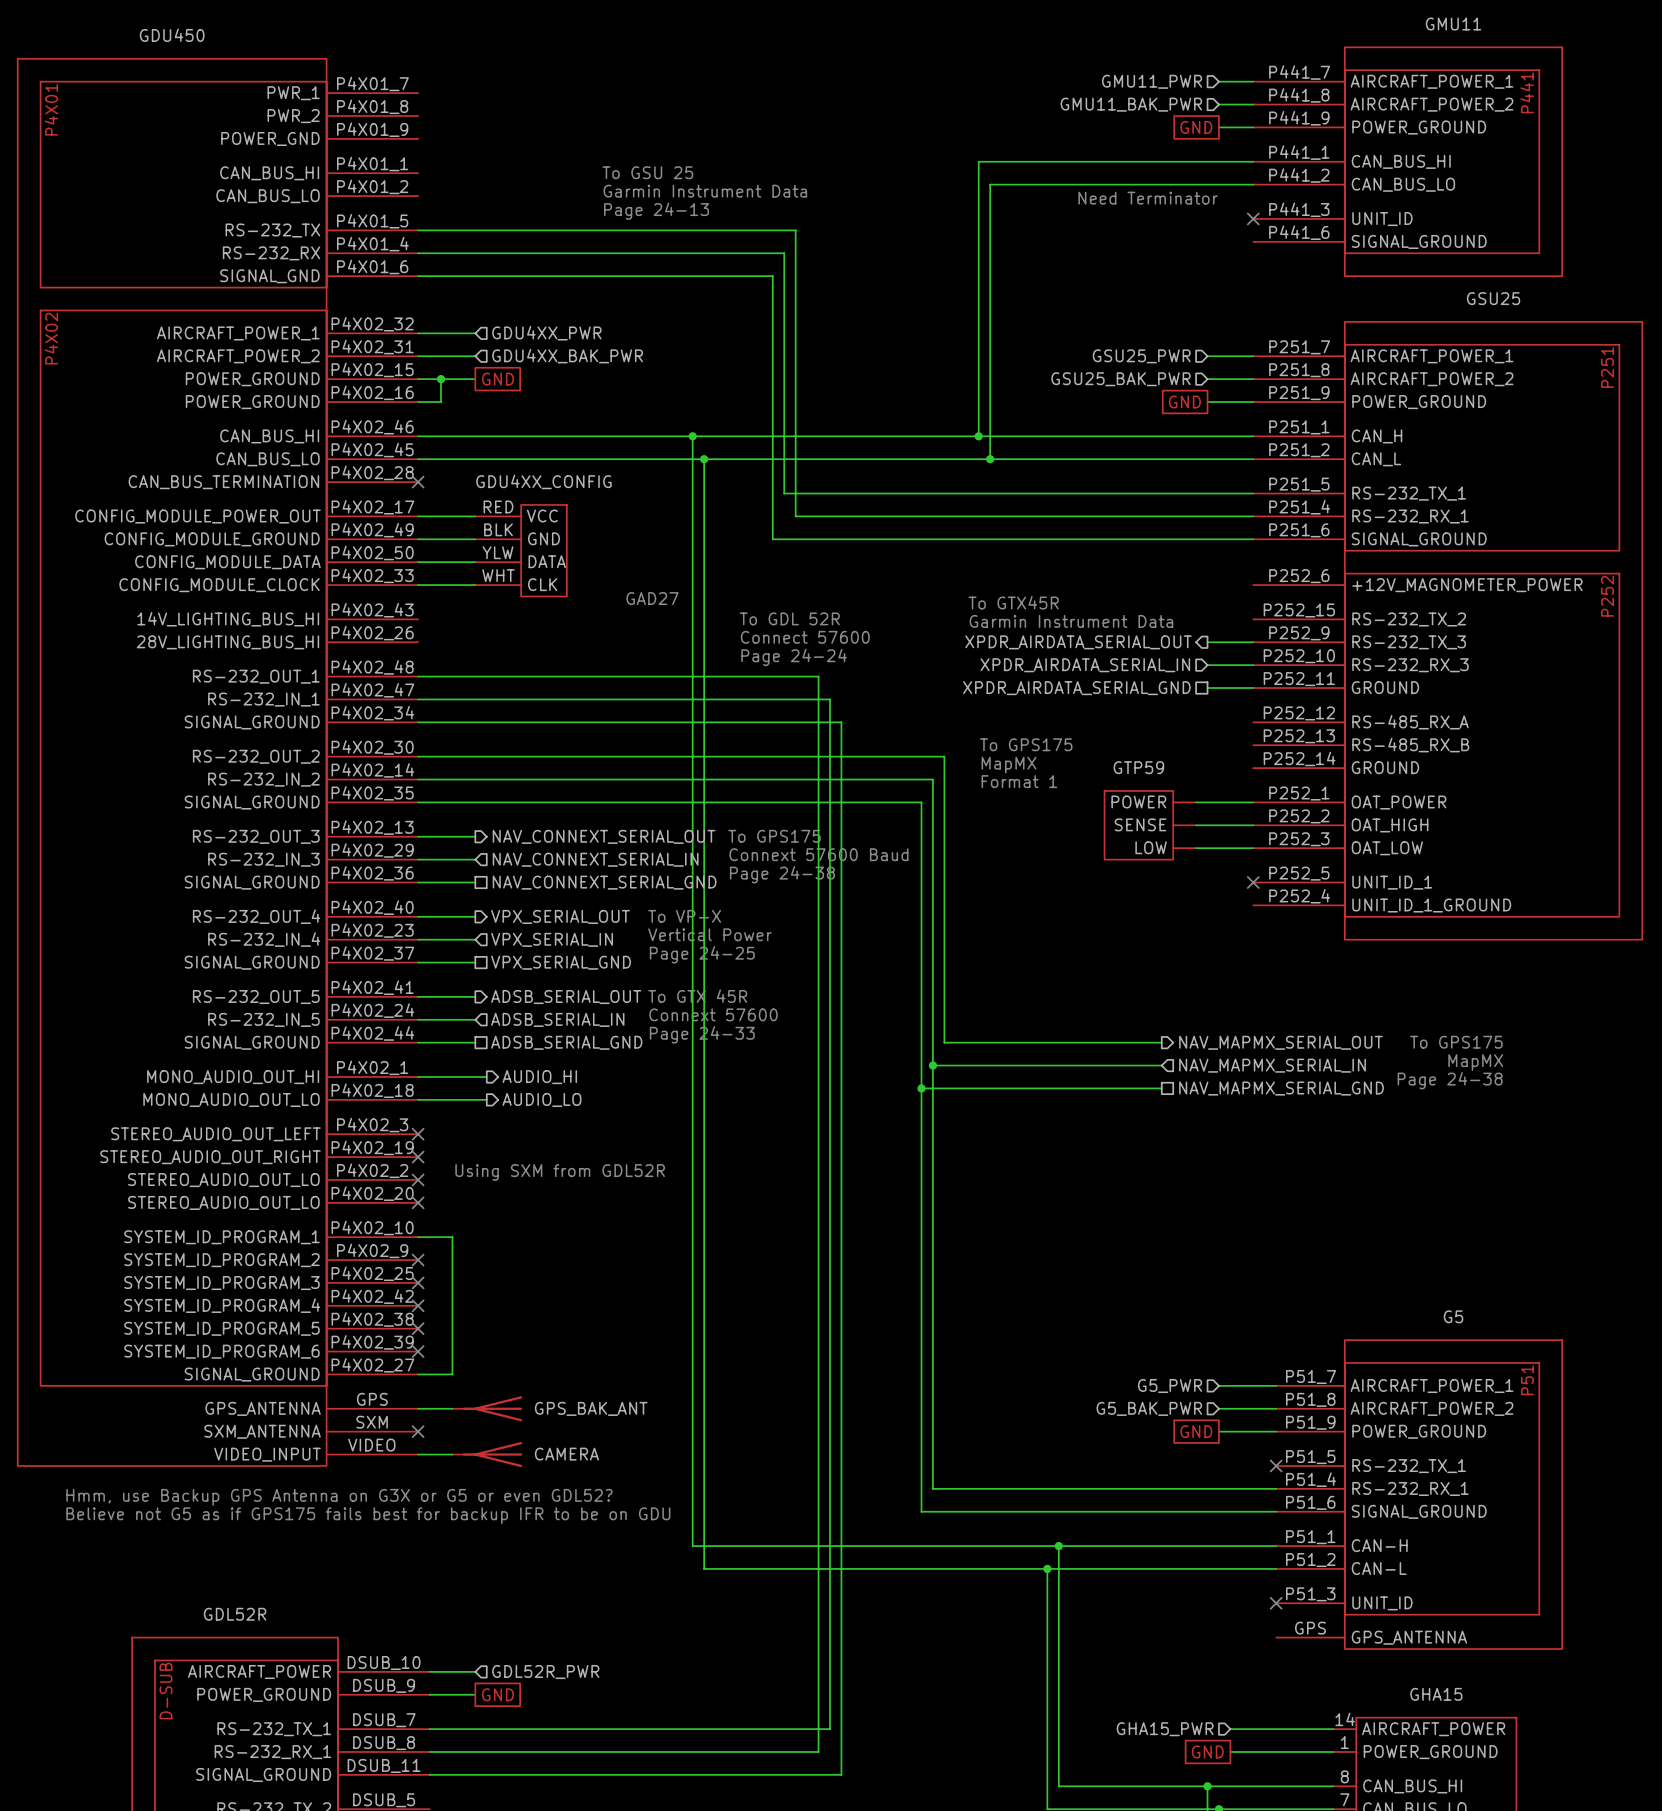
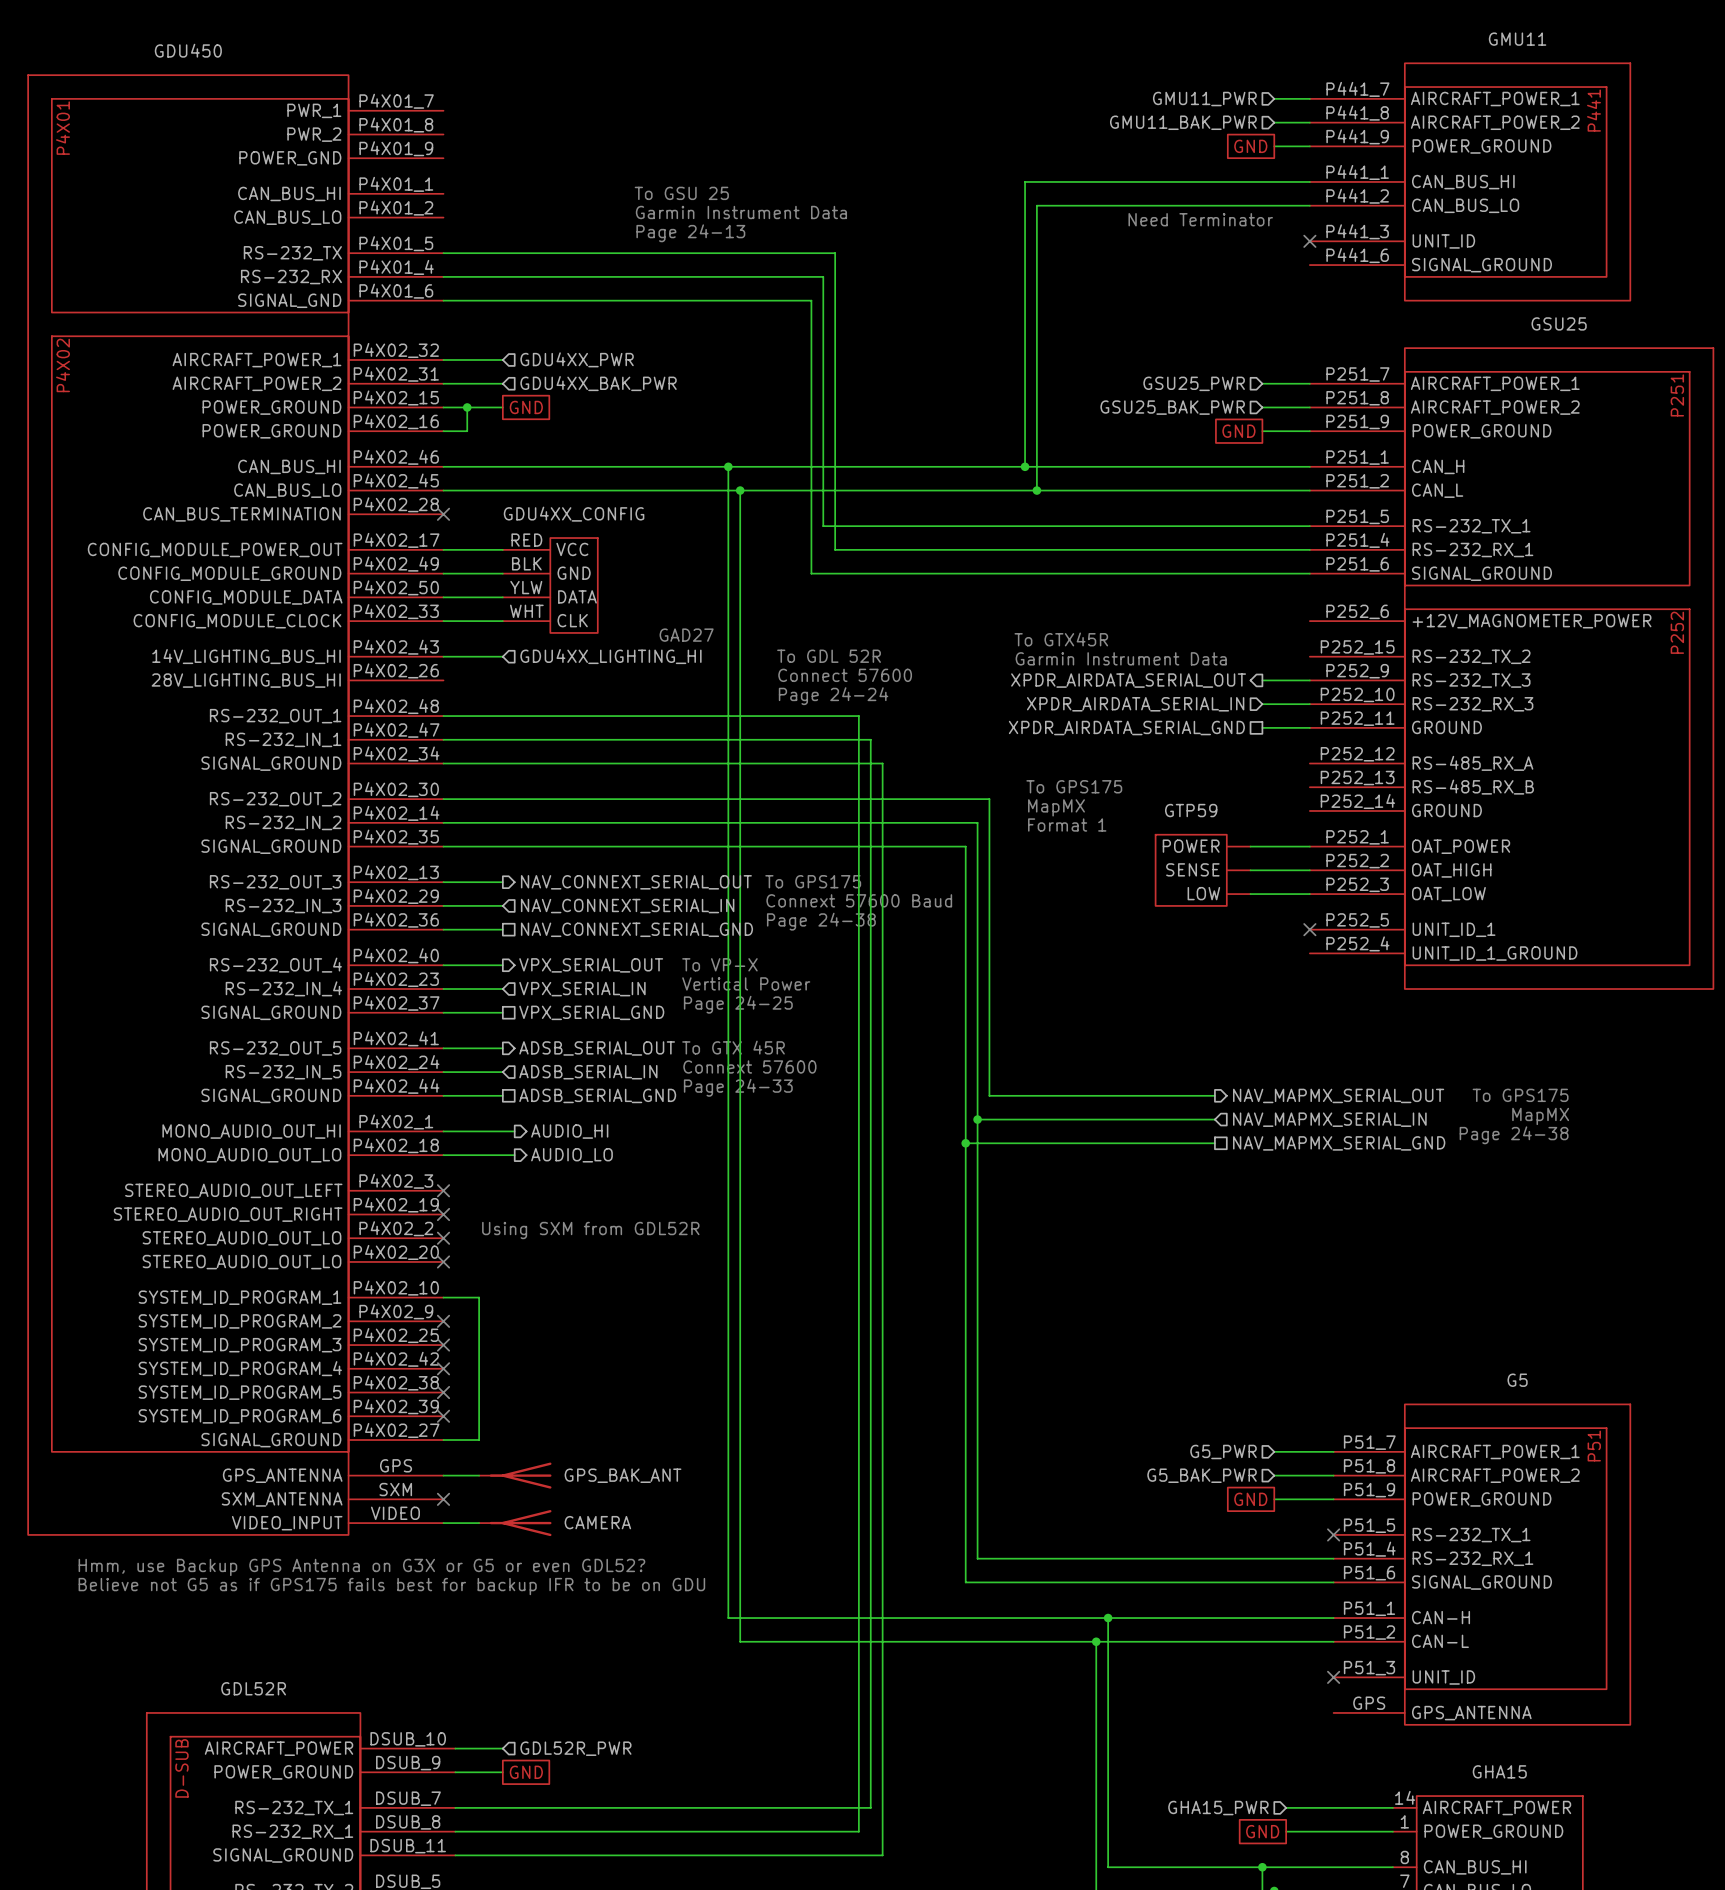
wire: none -> (443, 656) (502, 656)
hierarchical label: none -> GDU4XX_LIGHTING_HI (610, 656)

